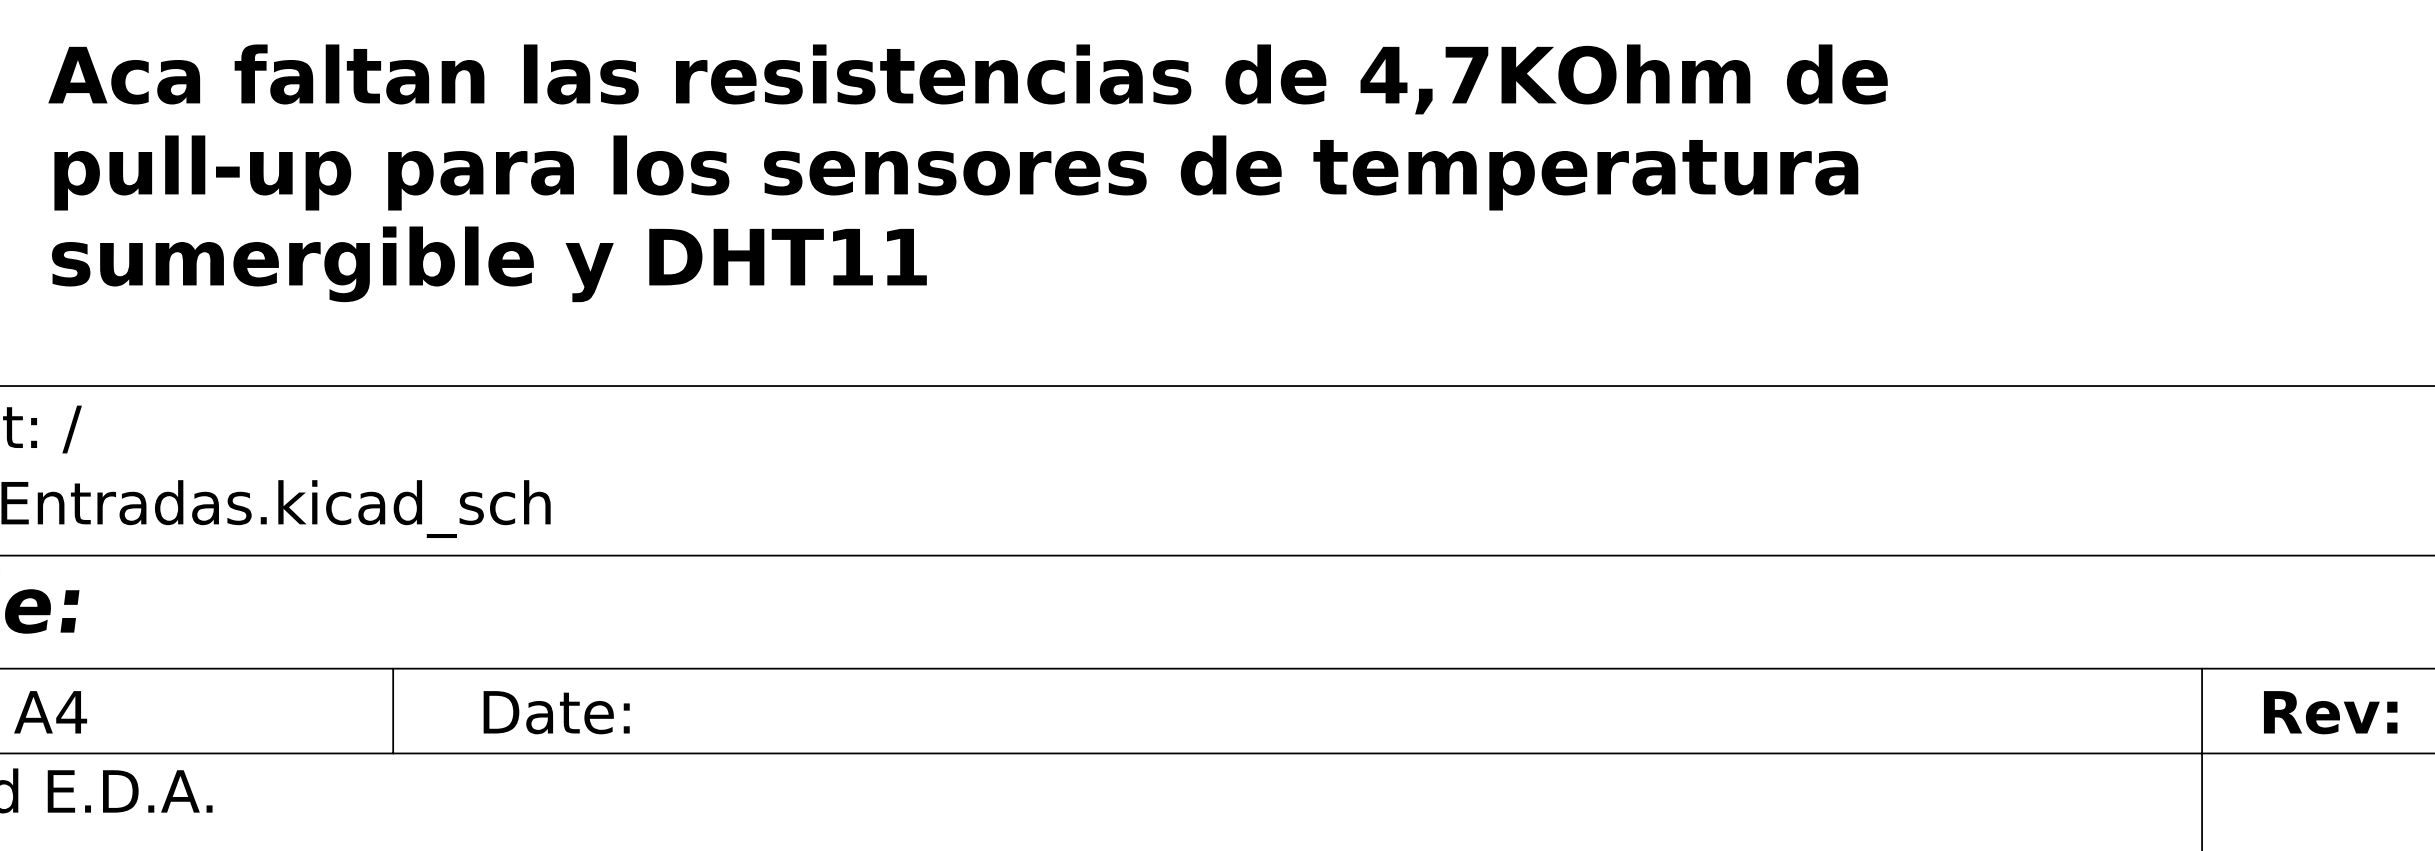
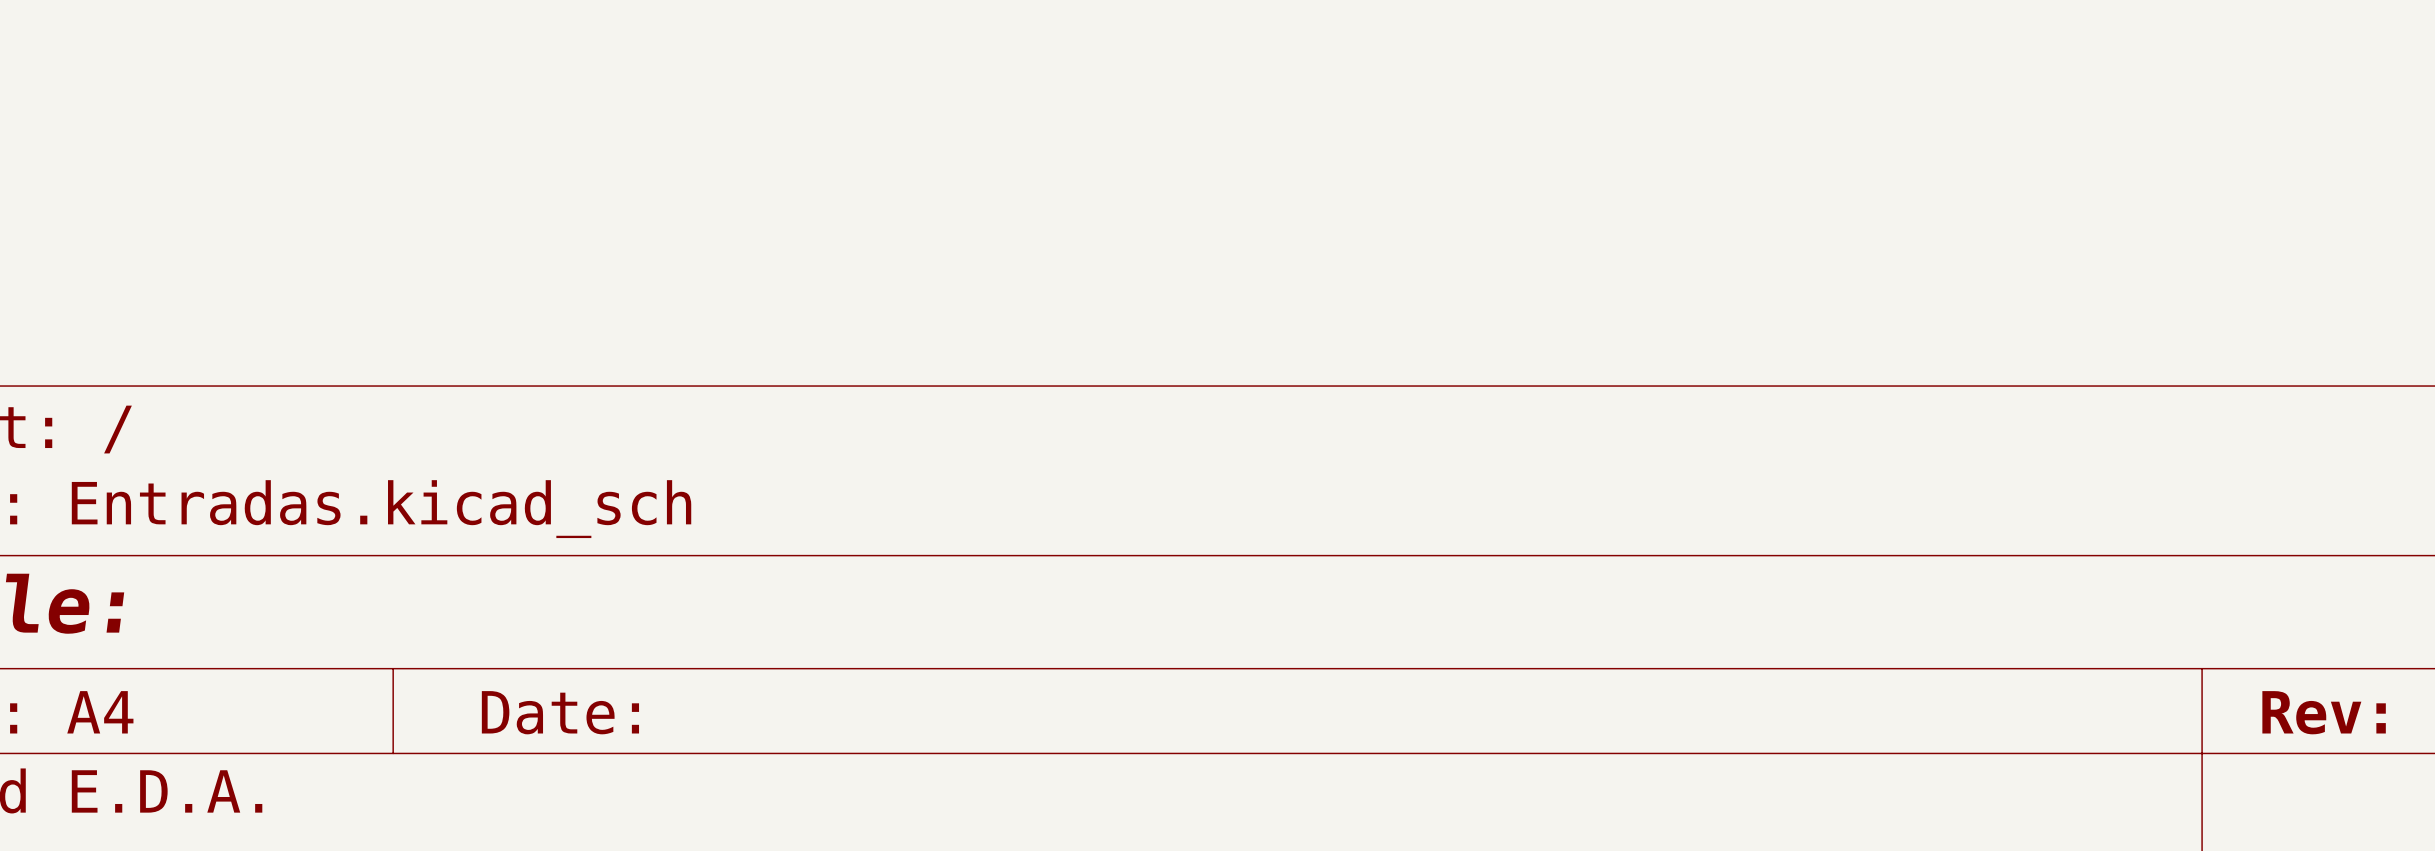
text: Aca faltan las resistencias de 4,7KOhm de (968, 79) -> none
text: pull-up para los sensores de temperatura (956, 173) -> none
text: sumergible y DHT11 (489, 264) -> none

